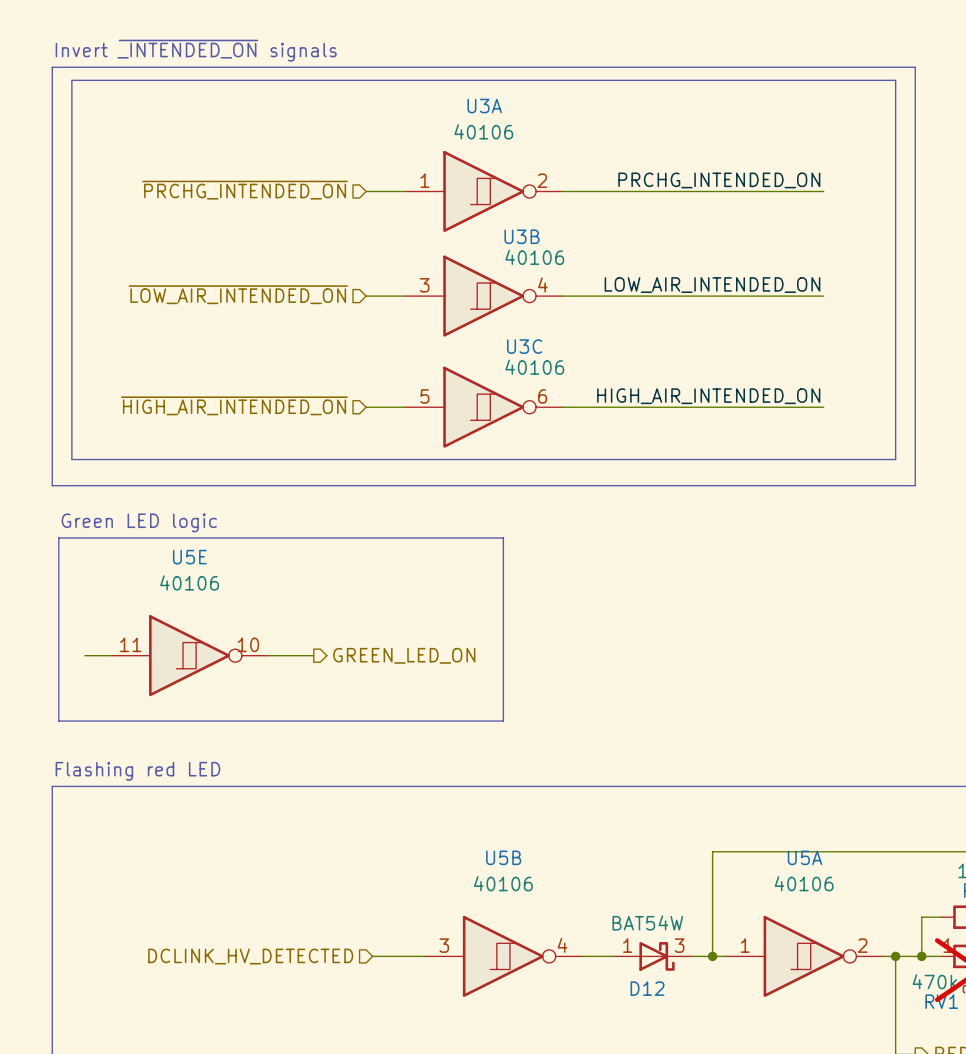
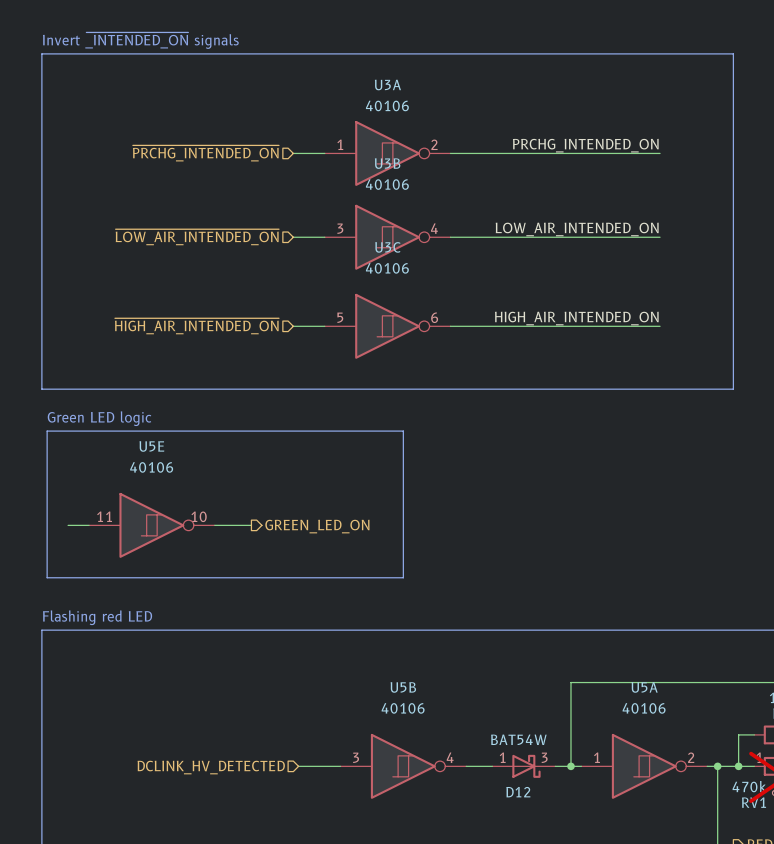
line: (71, 80) (895, 80) (895, 459) (71, 459) (71, 80) -> none
U3B name position: U3B (522, 236) -> U3B (387, 163)
U3B value position: 40106 (534, 257) -> 40106 (387, 184)
U3C name position: U3C (524, 346) -> U3C (387, 247)
U3C value position: 40106 (534, 367) -> 40106 (387, 268)

